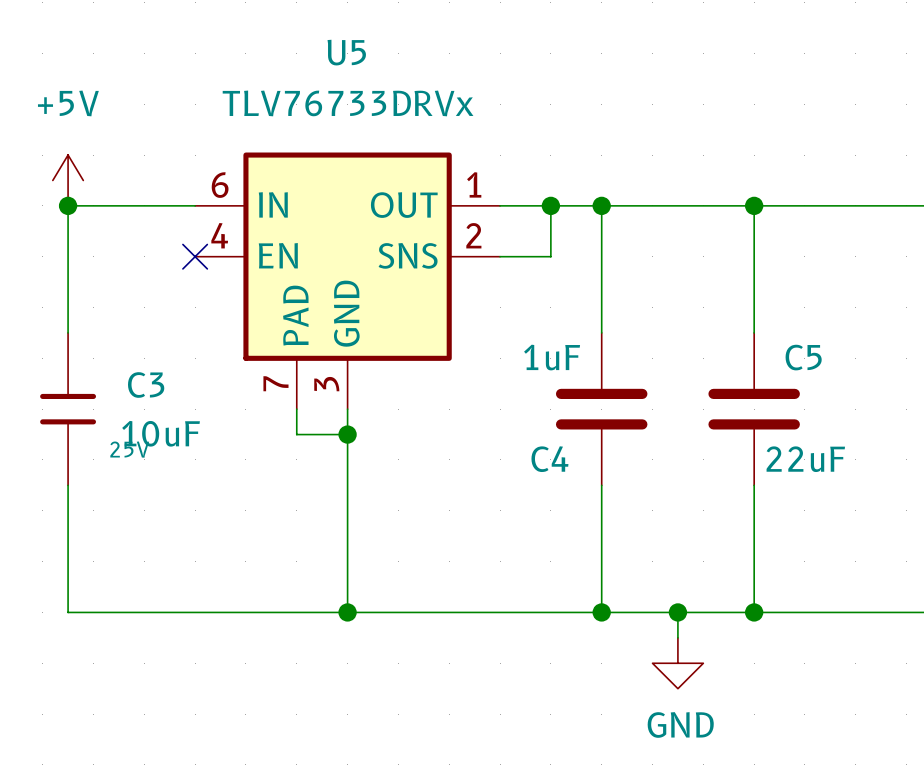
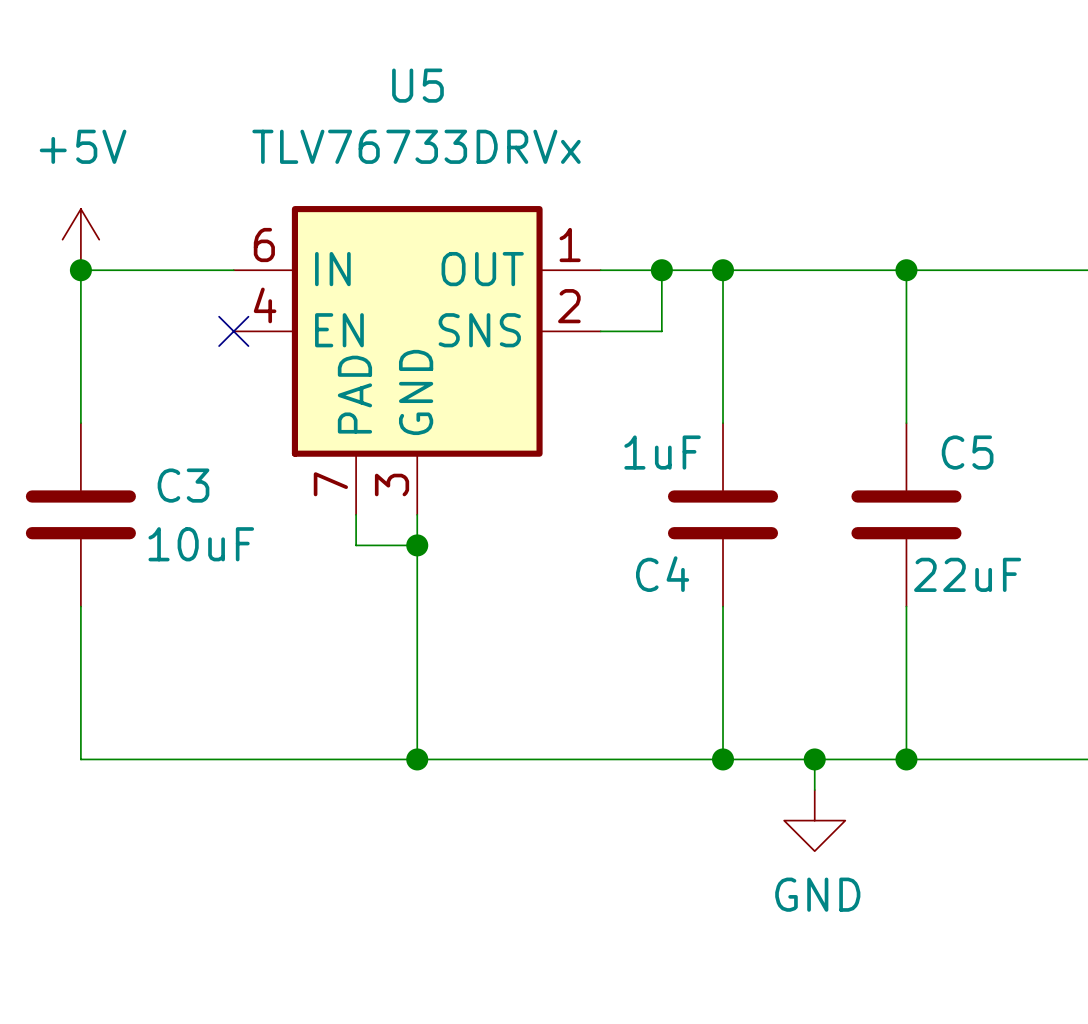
C3 symbol: [40, 332, 97, 486] -> [25, 423, 136, 607]
C3 text: 25V (129, 449) -> none

